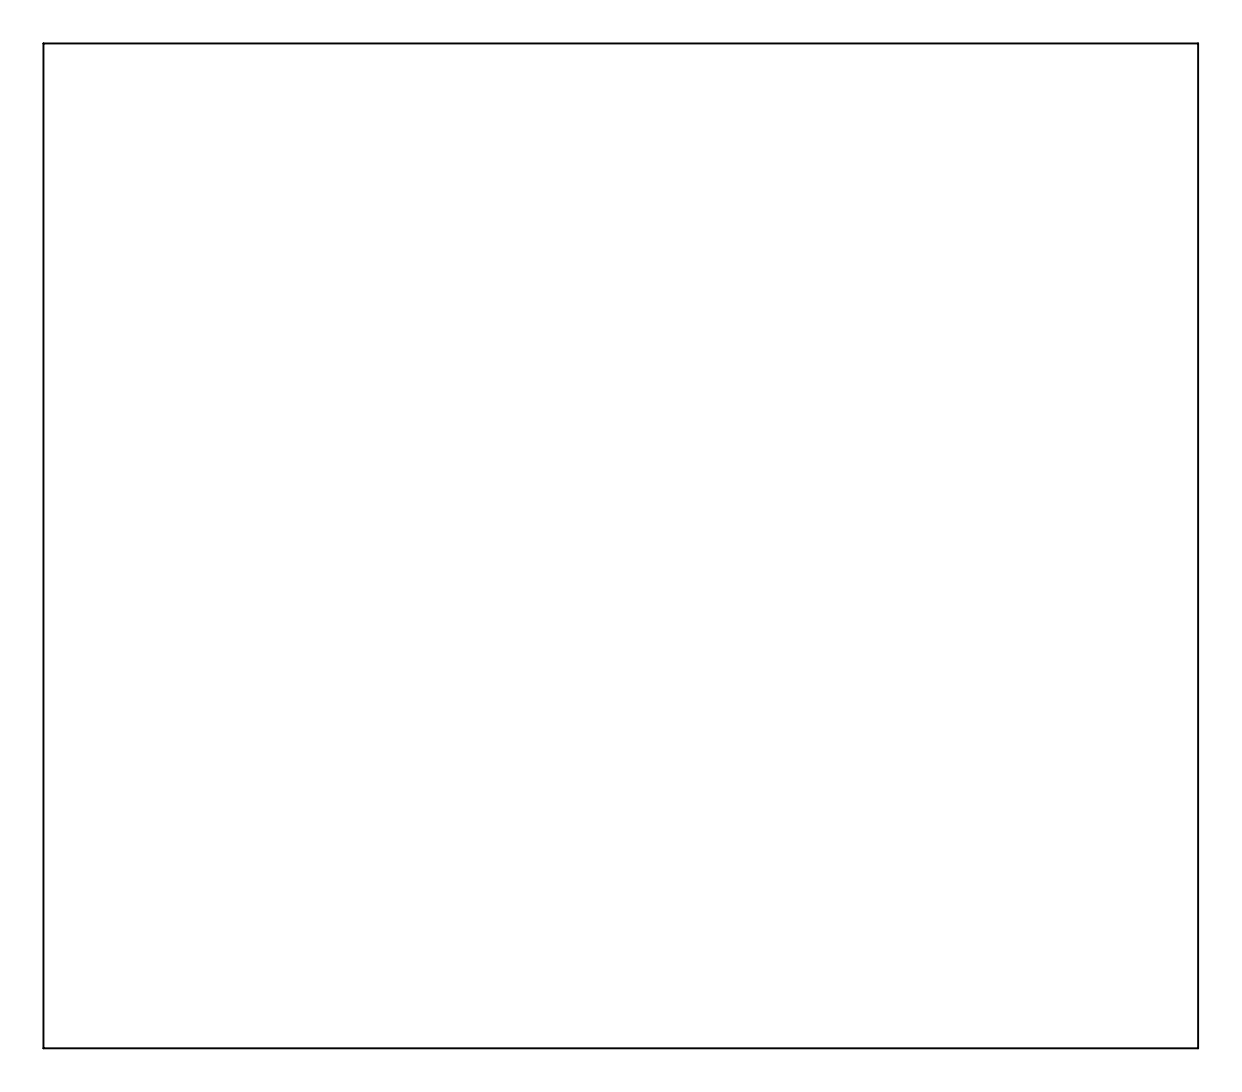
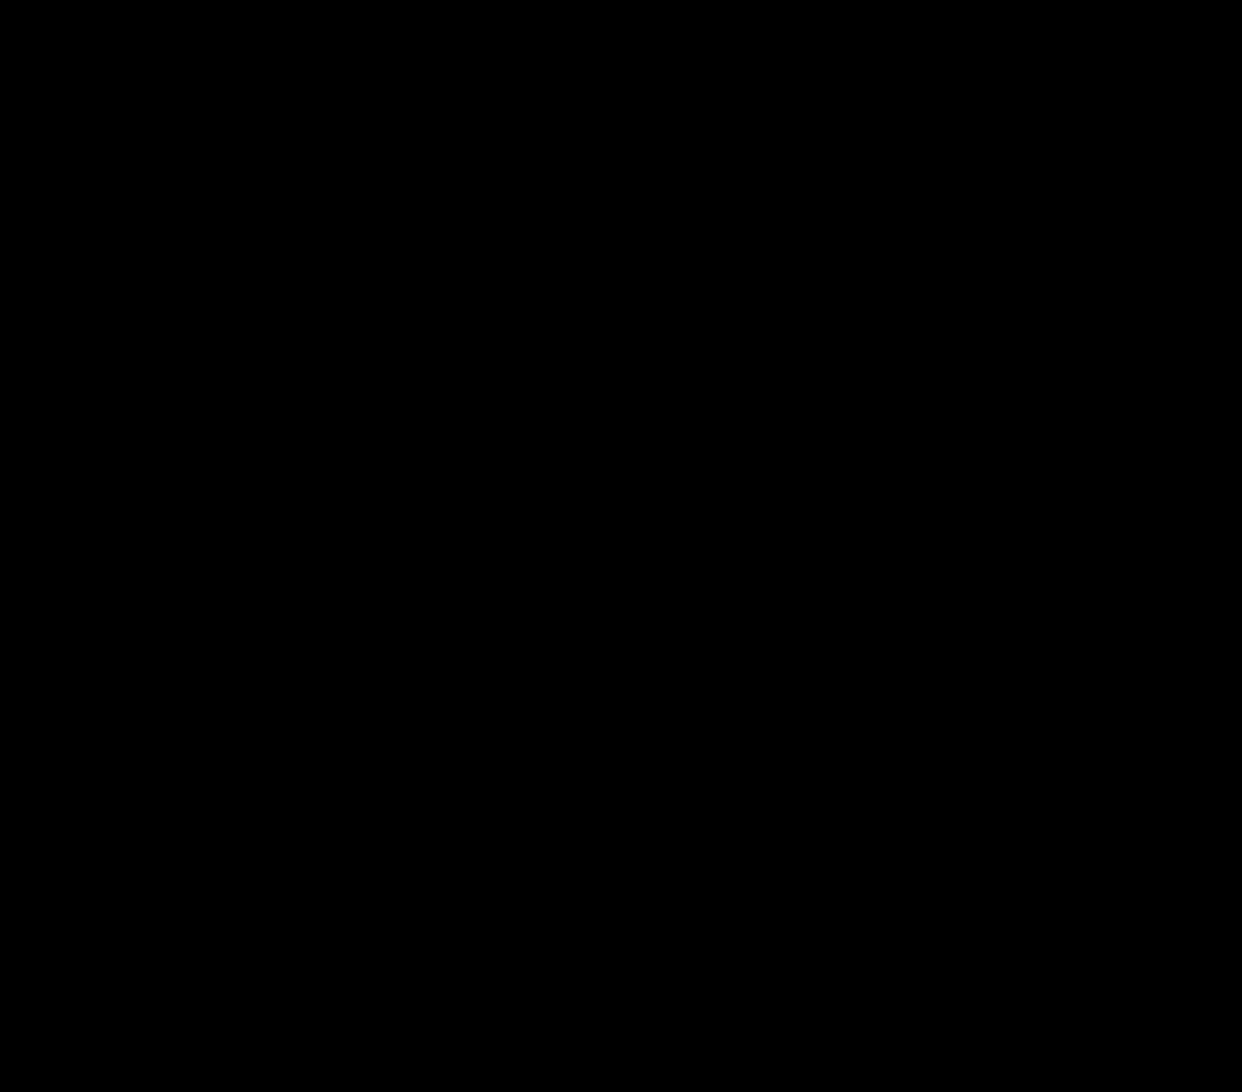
board edge: (1198, 43) (43, 43) (43, 1048) (1198, 1048) (1198, 43) -> none

